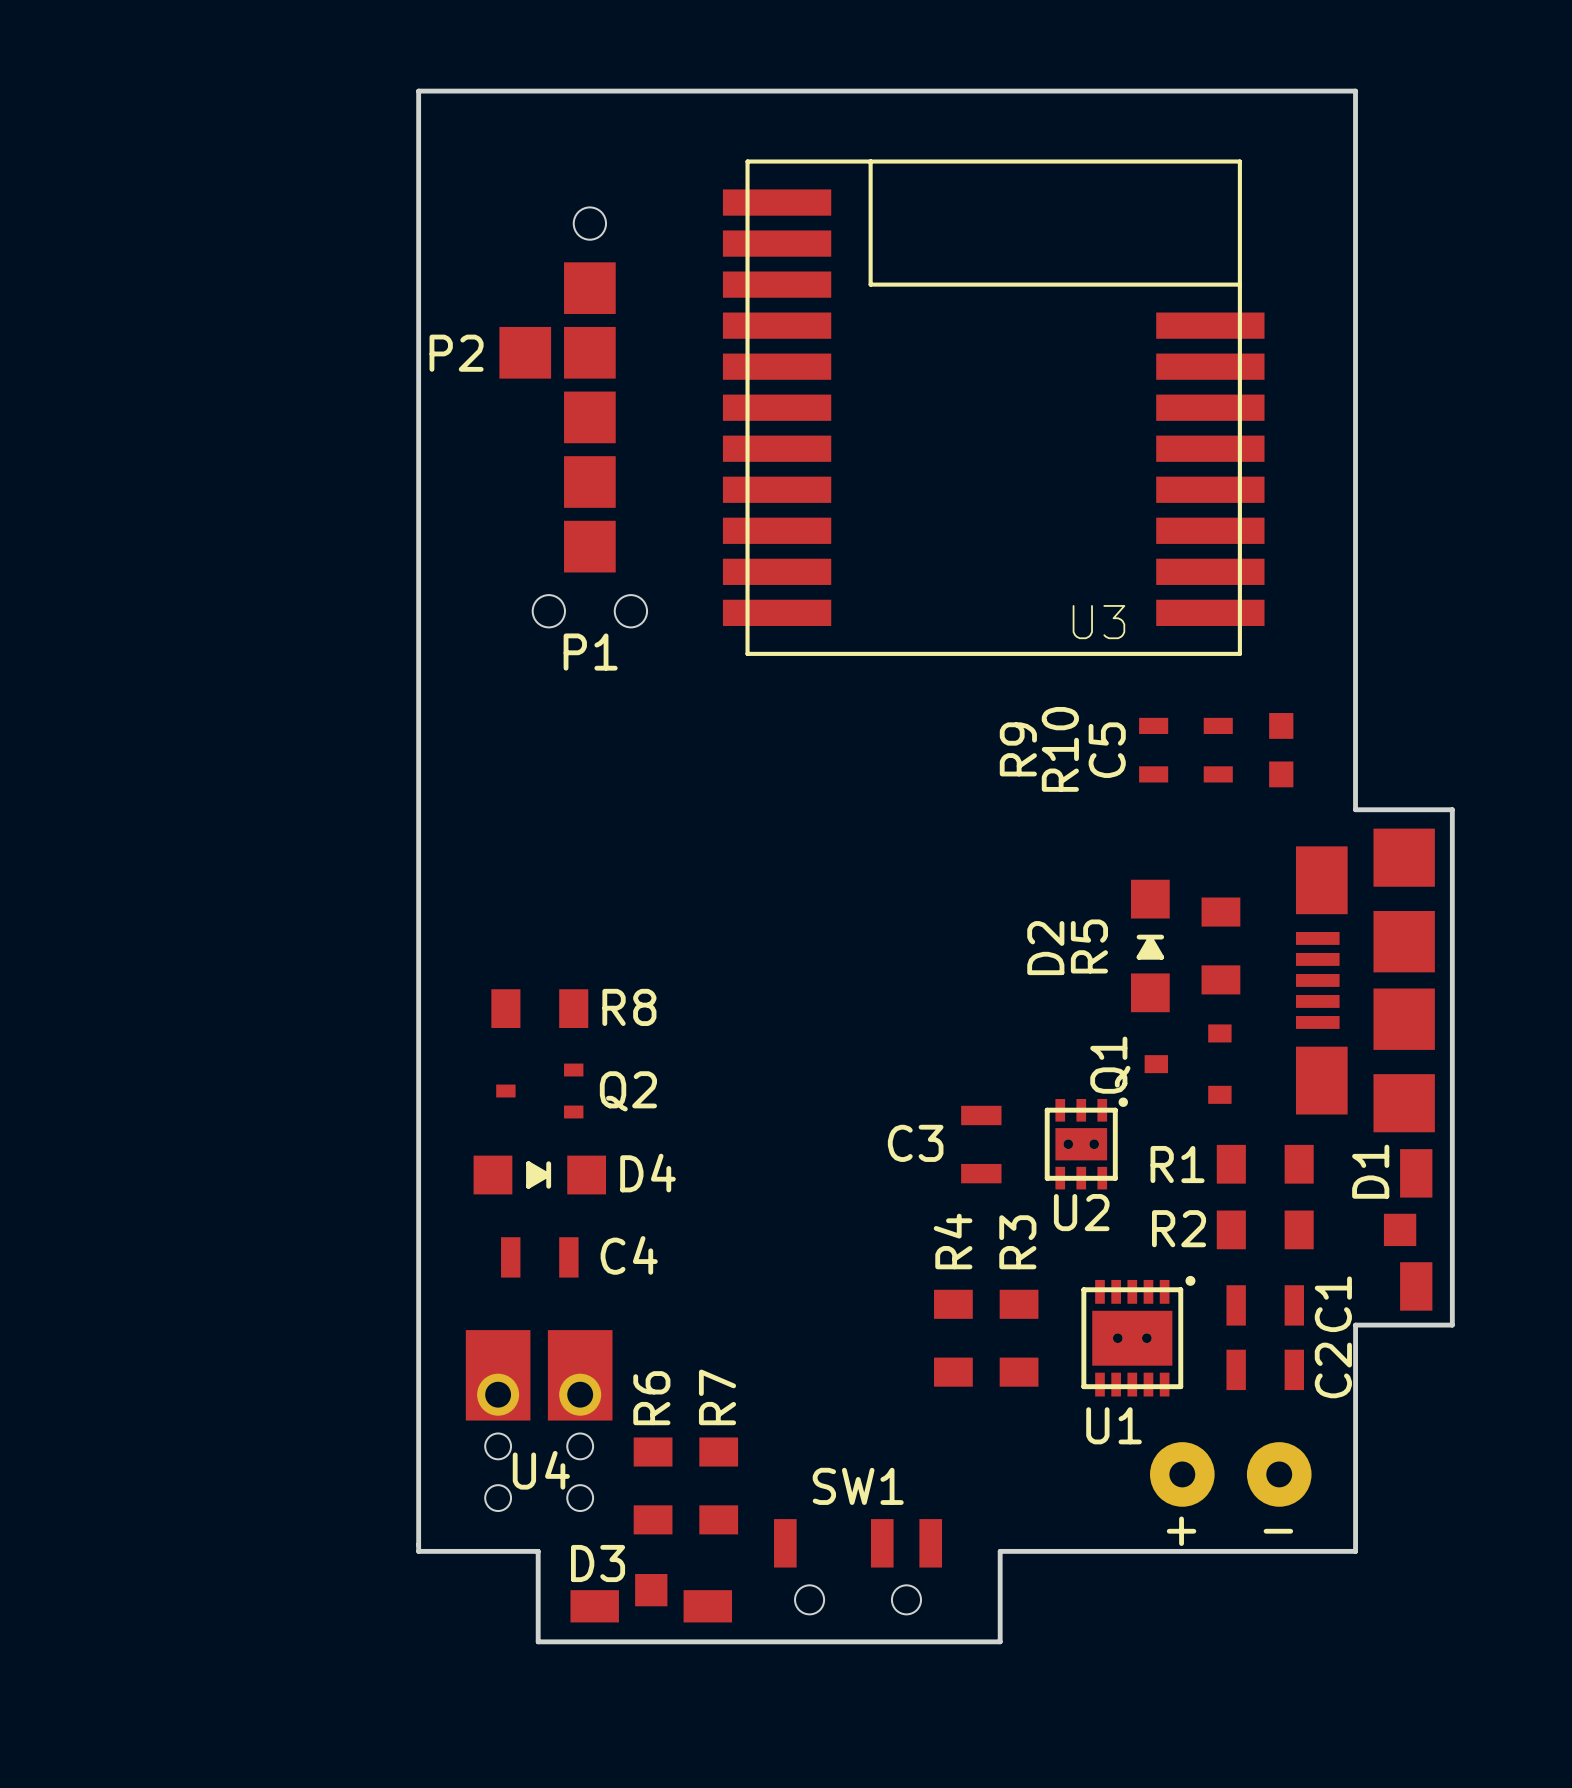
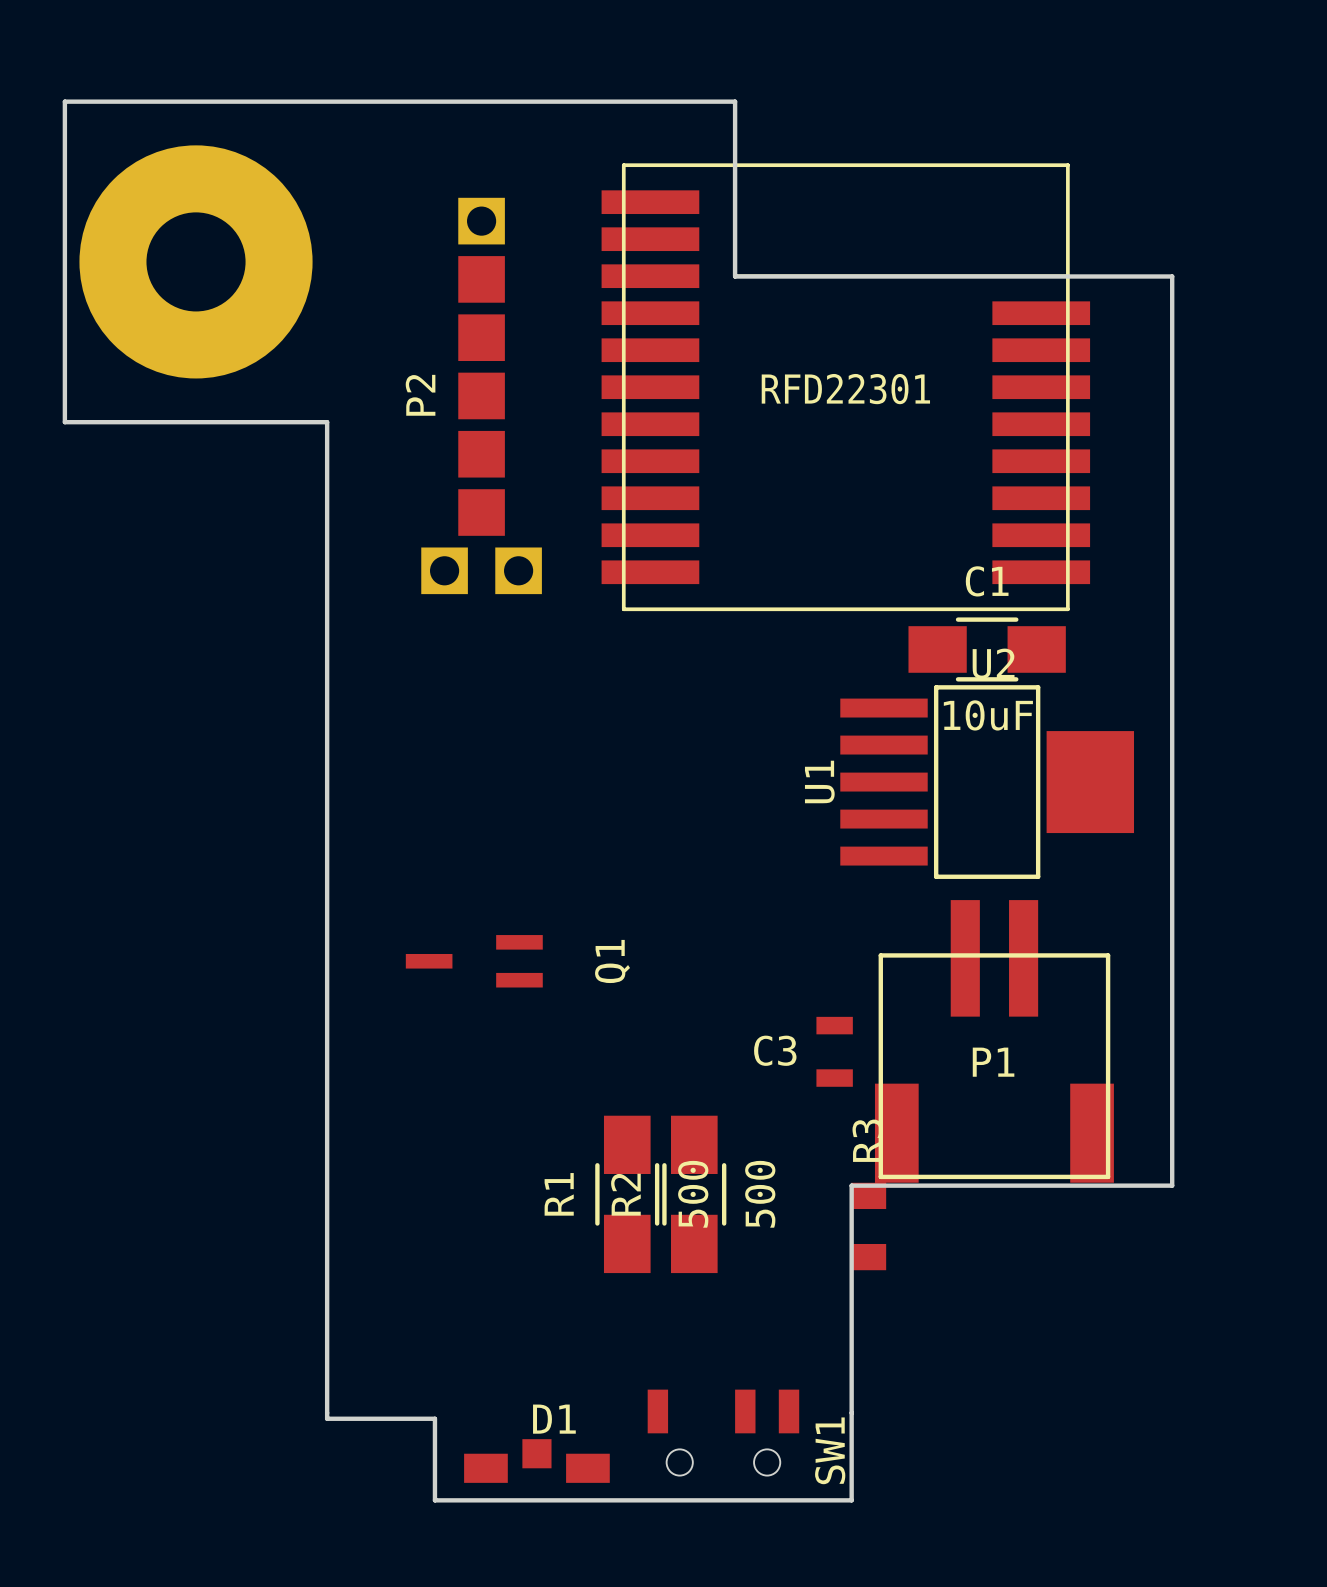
board edge: (418, 91) (418, 446) -> (327, 101) (64, 101) (64, 422) (327, 422)
board edge: (870, 91) (1355, 91) (1355, 284) -> (735, 101) (735, 276) (1172, 276)
P2 footprint: [532, 207, 648, 628] -> [421, 197, 542, 595]
part: none -> (196, 261)
P1 footprint: [499, 326, 552, 379] -> [874, 900, 1114, 1183]
P2 name position: P2 (456, 353) -> P2 (420, 395)
U3 value: none -> RFD22301 (845, 389)
U3 name: U3 (1098, 622) -> U2 (993, 663)
P1 name position: P1 (590, 652) -> P1 (993, 1062)
R9: (1153, 750) -> none
R10: (1218, 750) -> none
C5: (1281, 750) -> none
C1 value: none -> 10uF (988, 715)
board edge: (1355, 809) (1452, 809) (1452, 1325) (1355, 1325) (1355, 1551) (1000, 1551) -> (1172, 749) (1172, 1185) (851, 1185) (851, 1418)
D2: (1150, 945) -> none
R5: (1220, 945) -> none
part: (1365, 980) -> none
R8: (539, 1008) -> none
Q1 footprint: [1144, 1024, 1232, 1104] -> [405, 935, 543, 988]
Q1 name position: Q1 (1110, 1065) -> Q1 (612, 961)
Q2: (539, 1091) -> none
U2: (1086, 1143) -> none
R1 footprint: [1216, 1144, 1314, 1184] -> [595, 1115, 660, 1274]
D4: (539, 1175) -> none
R2 footprint: [1216, 1210, 1314, 1250] -> [662, 1115, 727, 1274]
D1: (1408, 1229) -> none
C4: (539, 1257) -> none
U1 footprint: [1081, 1275, 1196, 1397] -> [840, 685, 1135, 879]
C1 footprint: [1226, 1285, 1305, 1326] -> [908, 617, 1066, 682]
R1 value: none -> 500 (693, 1194)
R2 value: none -> 500 (760, 1194)
C1 name position: C1 (1333, 1304) -> C1 (987, 581)
R4: (953, 1338) -> none
C2: (1265, 1369) -> none
U4: (539, 1420) -> none
U1 name position: U1 (1114, 1425) -> U1 (819, 781)
part: (1230, 1474) -> none
R6: (653, 1485) -> none
R7: (718, 1485) -> none
SW1 name rotation: 0° (858, 1486) -> 90° counterclockwise (830, 1450)
SW1 name position: SW1 (858, 1486) -> SW1 (830, 1450)
D3 name: D3 (598, 1563) -> D1 (554, 1419)

